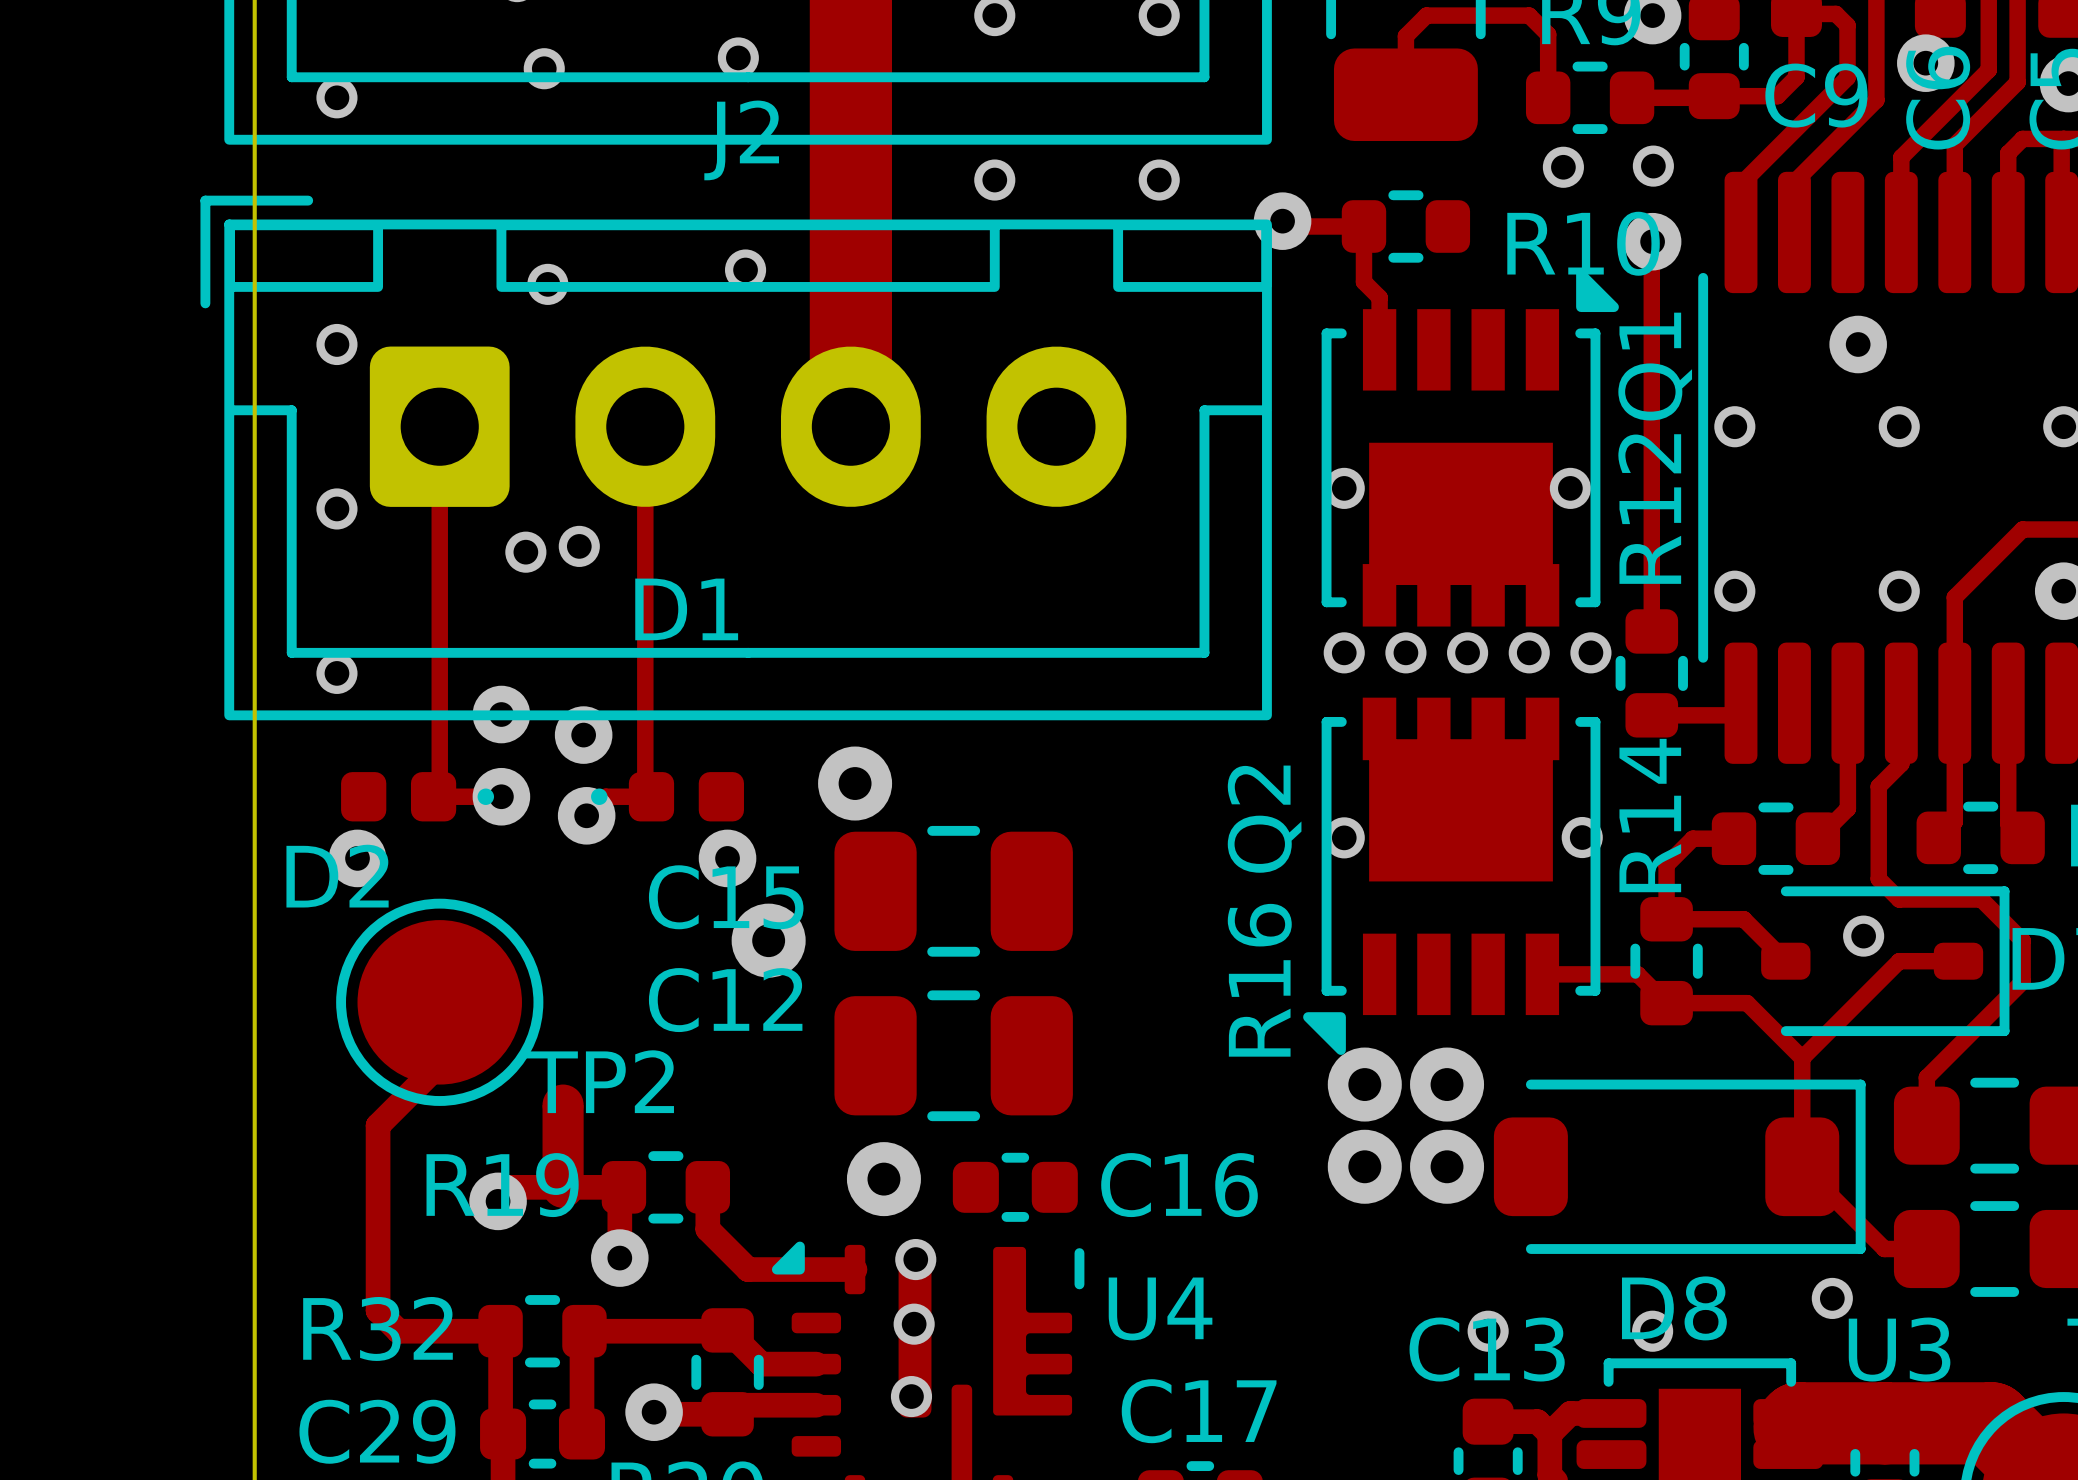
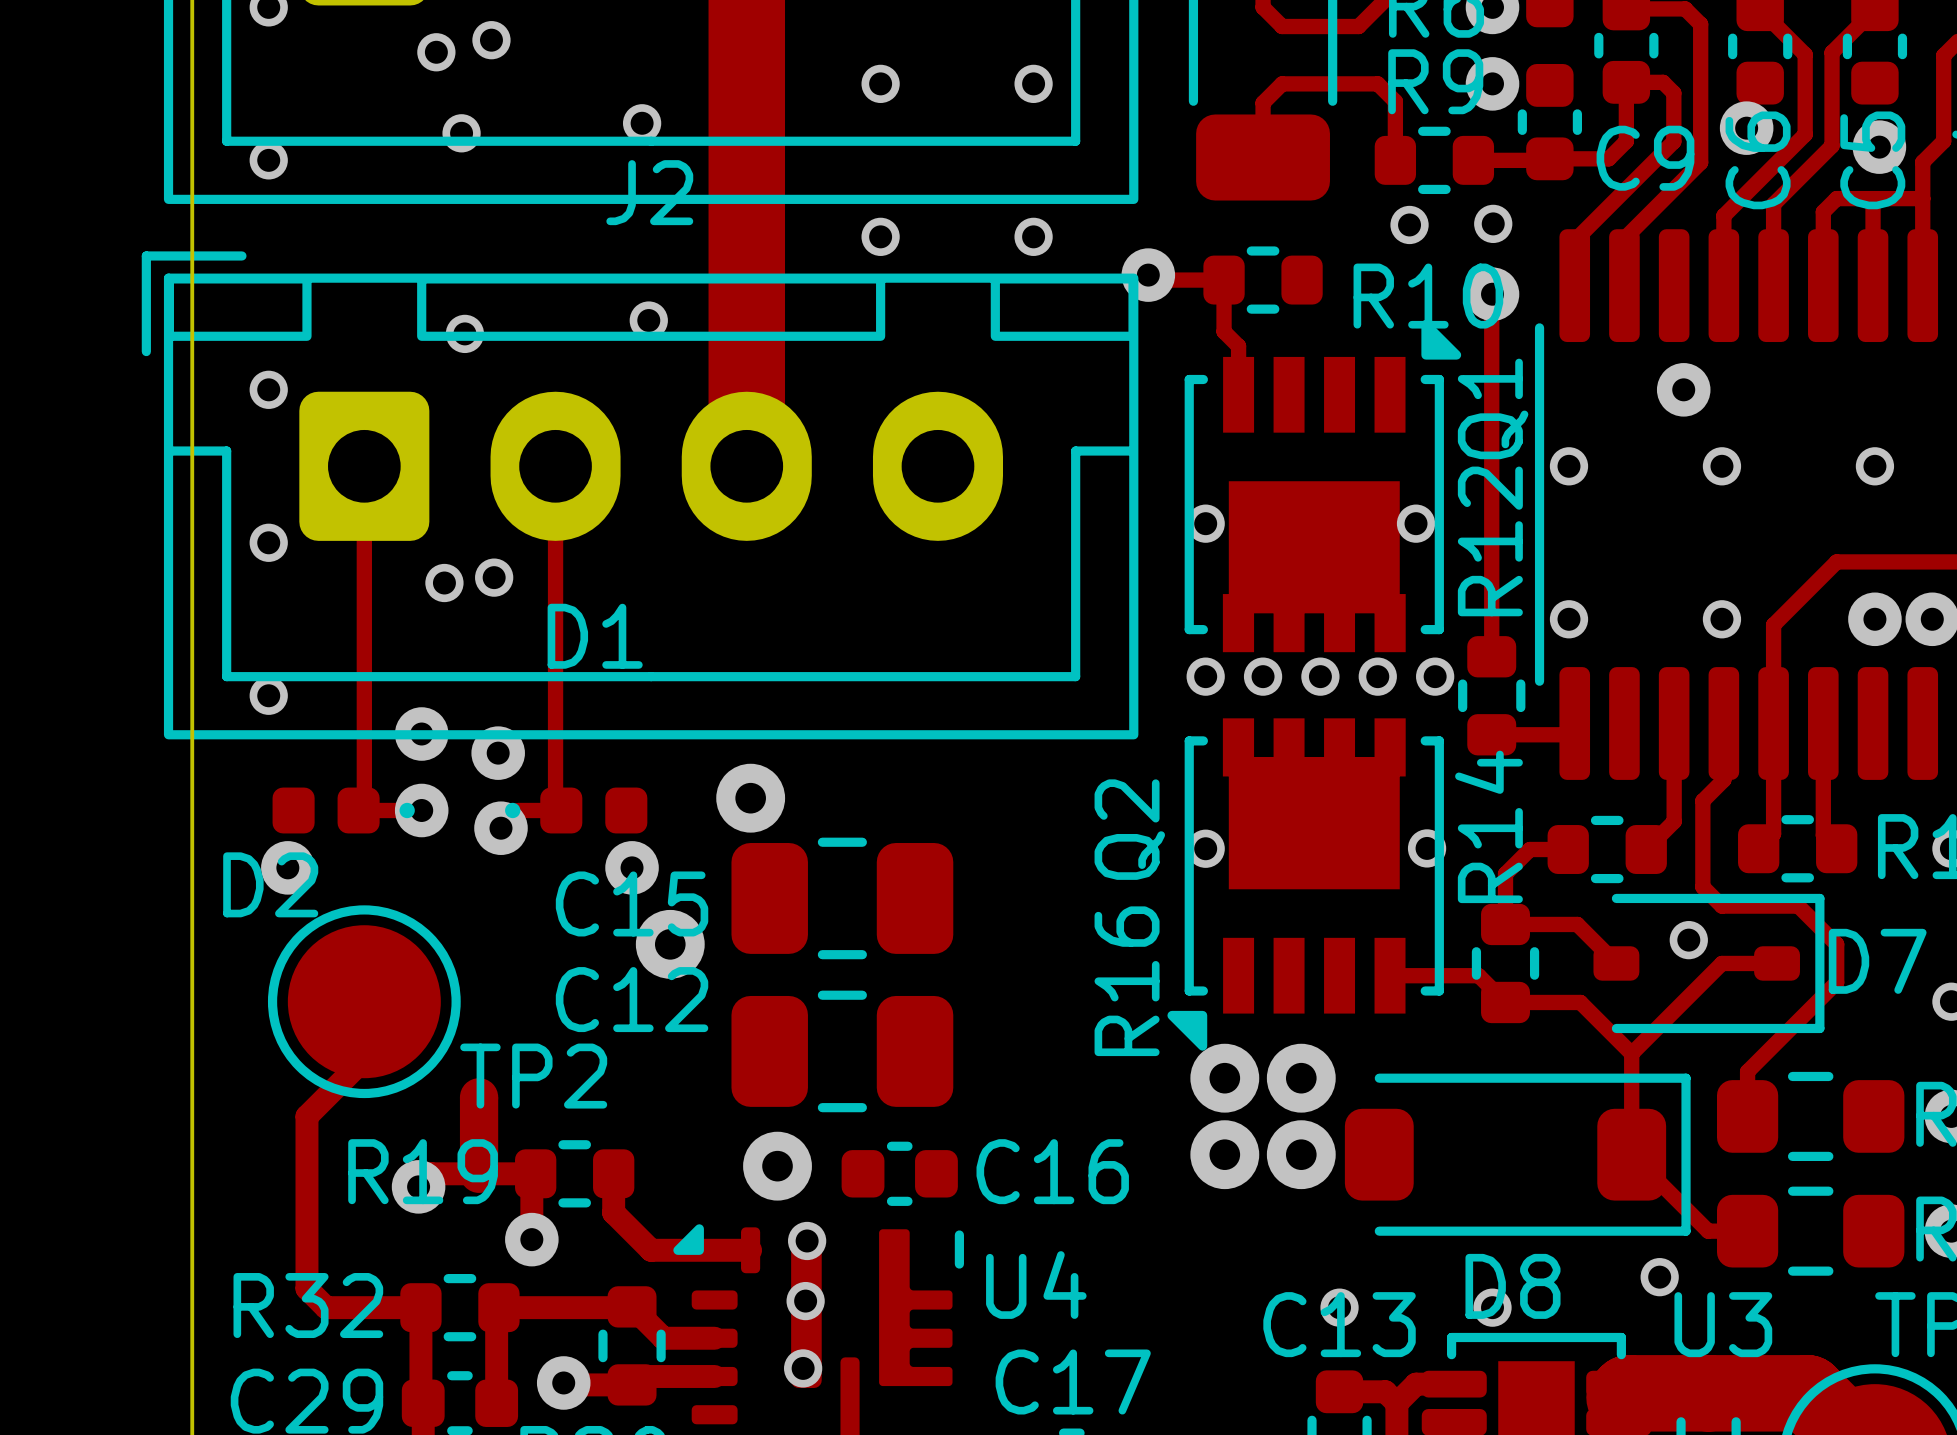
TP2 name position: TP2 (599, 1081) -> TP2 (533, 1076)

